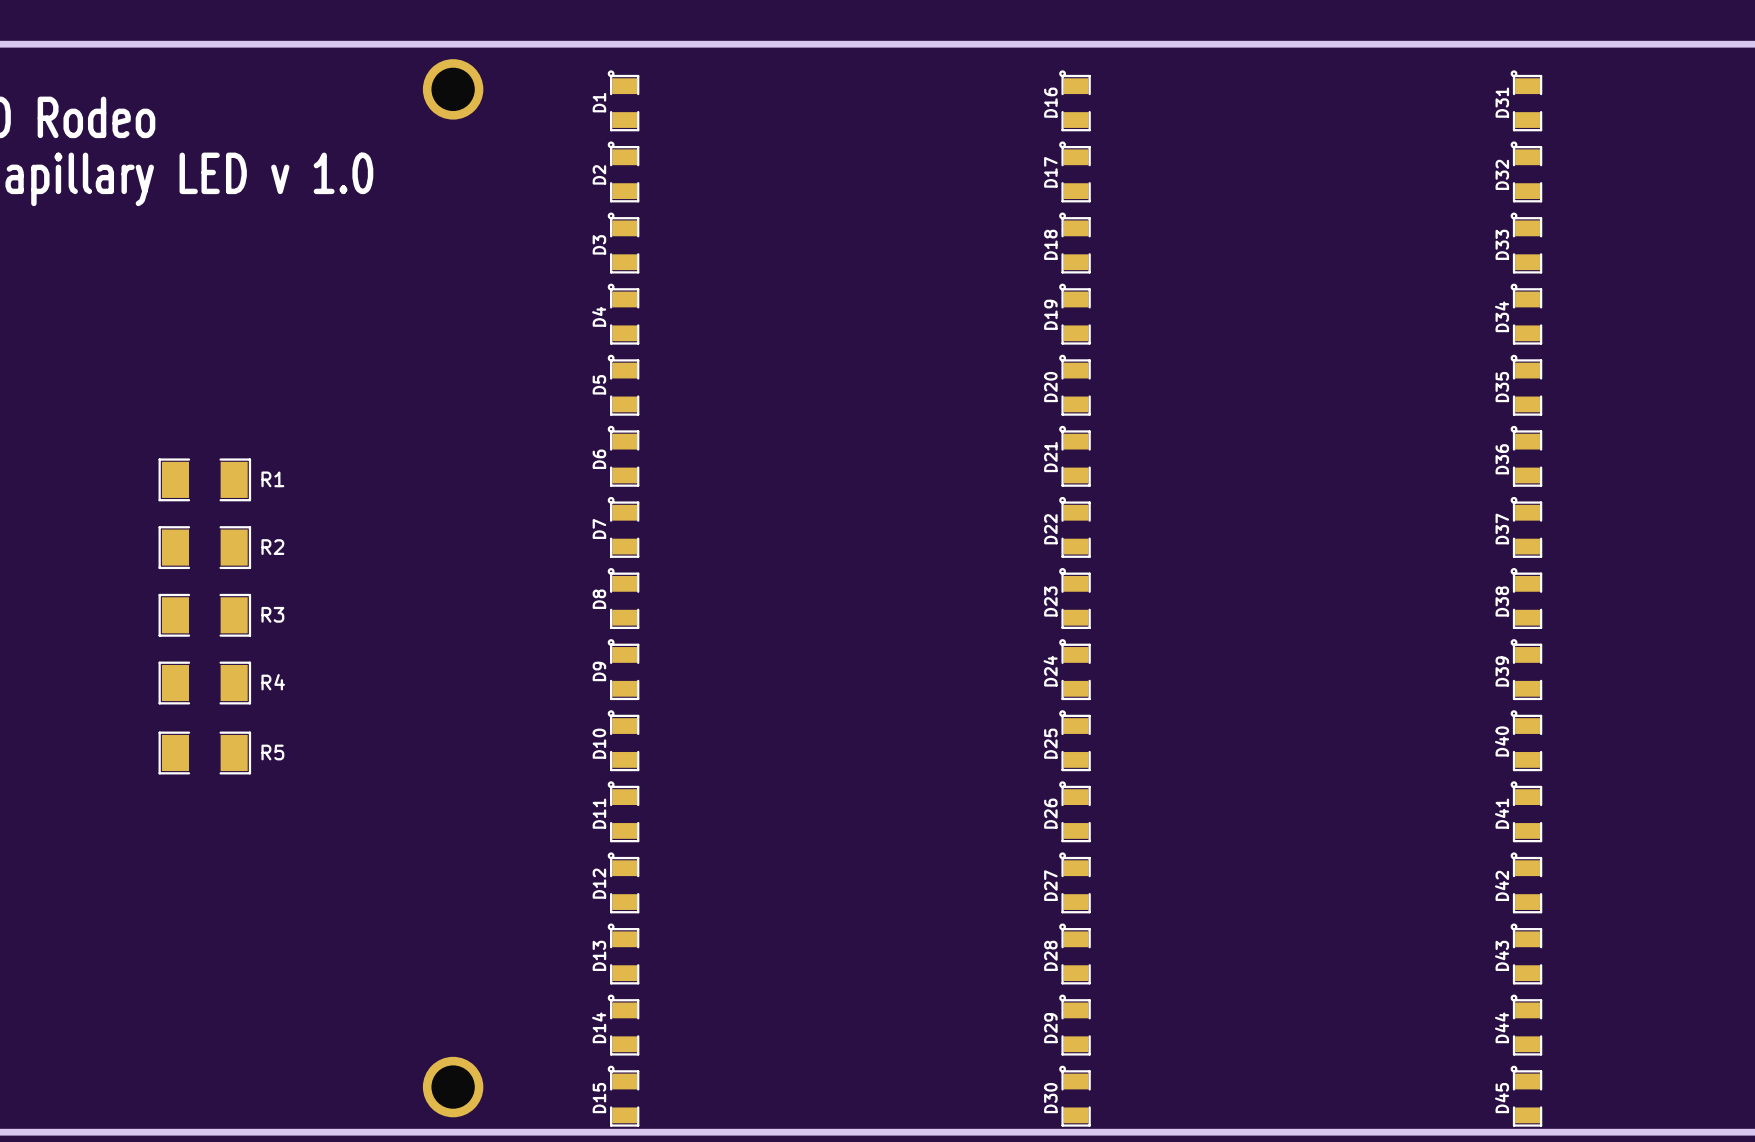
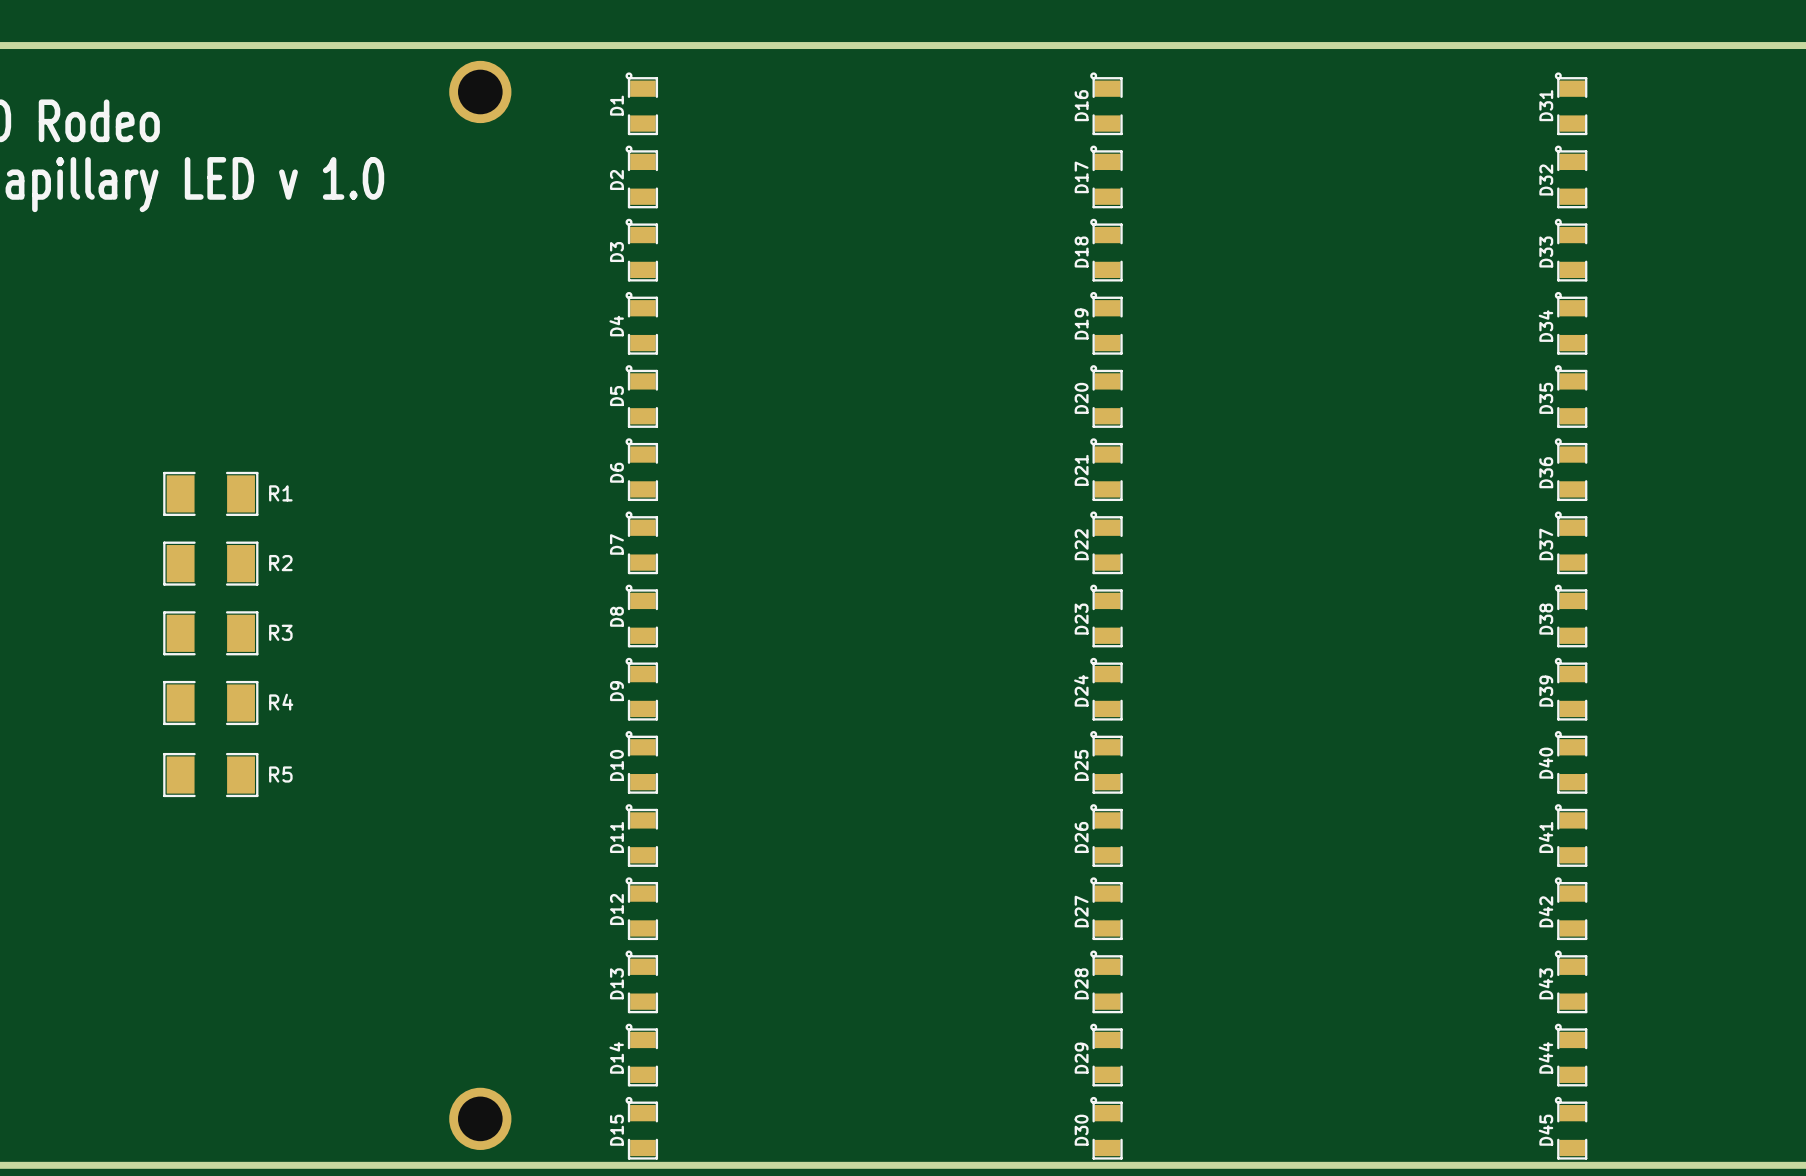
part position: (453, 89) -> (480, 91)
part position: (453, 1087) -> (480, 1118)

